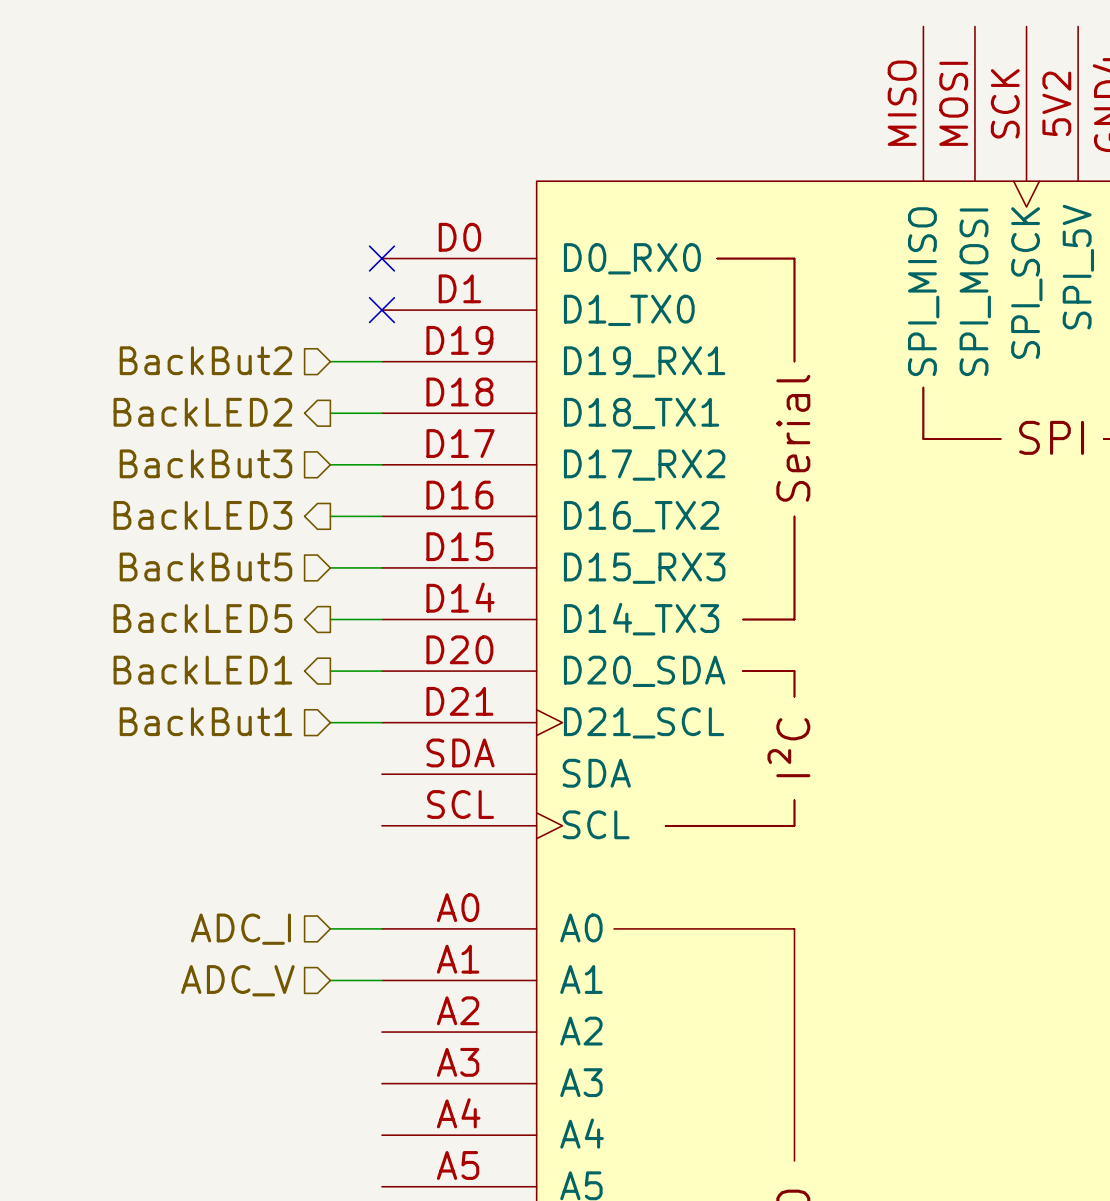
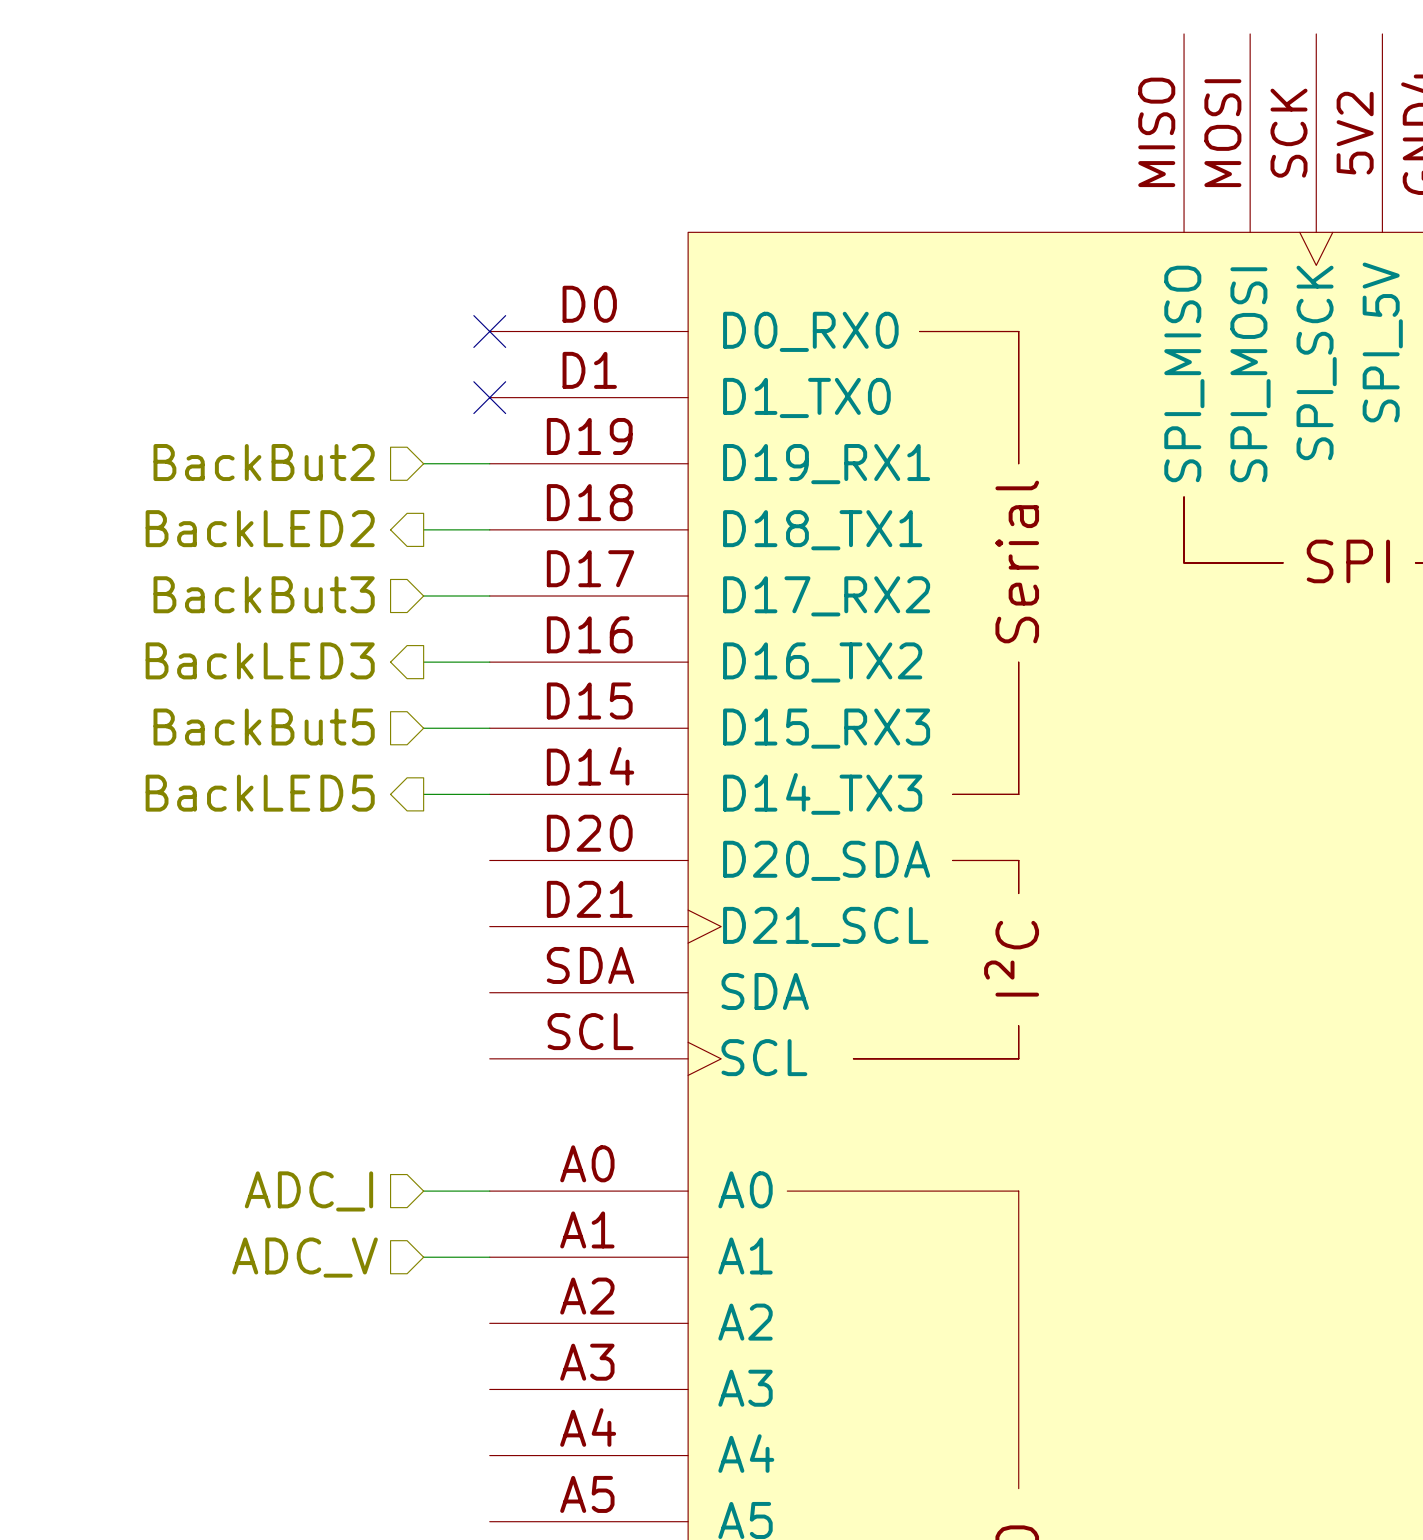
hierarchical label: BackLED1 (202, 670) -> none
wire: (330, 671) (381, 671) -> none
hierarchical label: BackBut1 (205, 721) -> none
wire: (330, 722) (381, 722) -> none

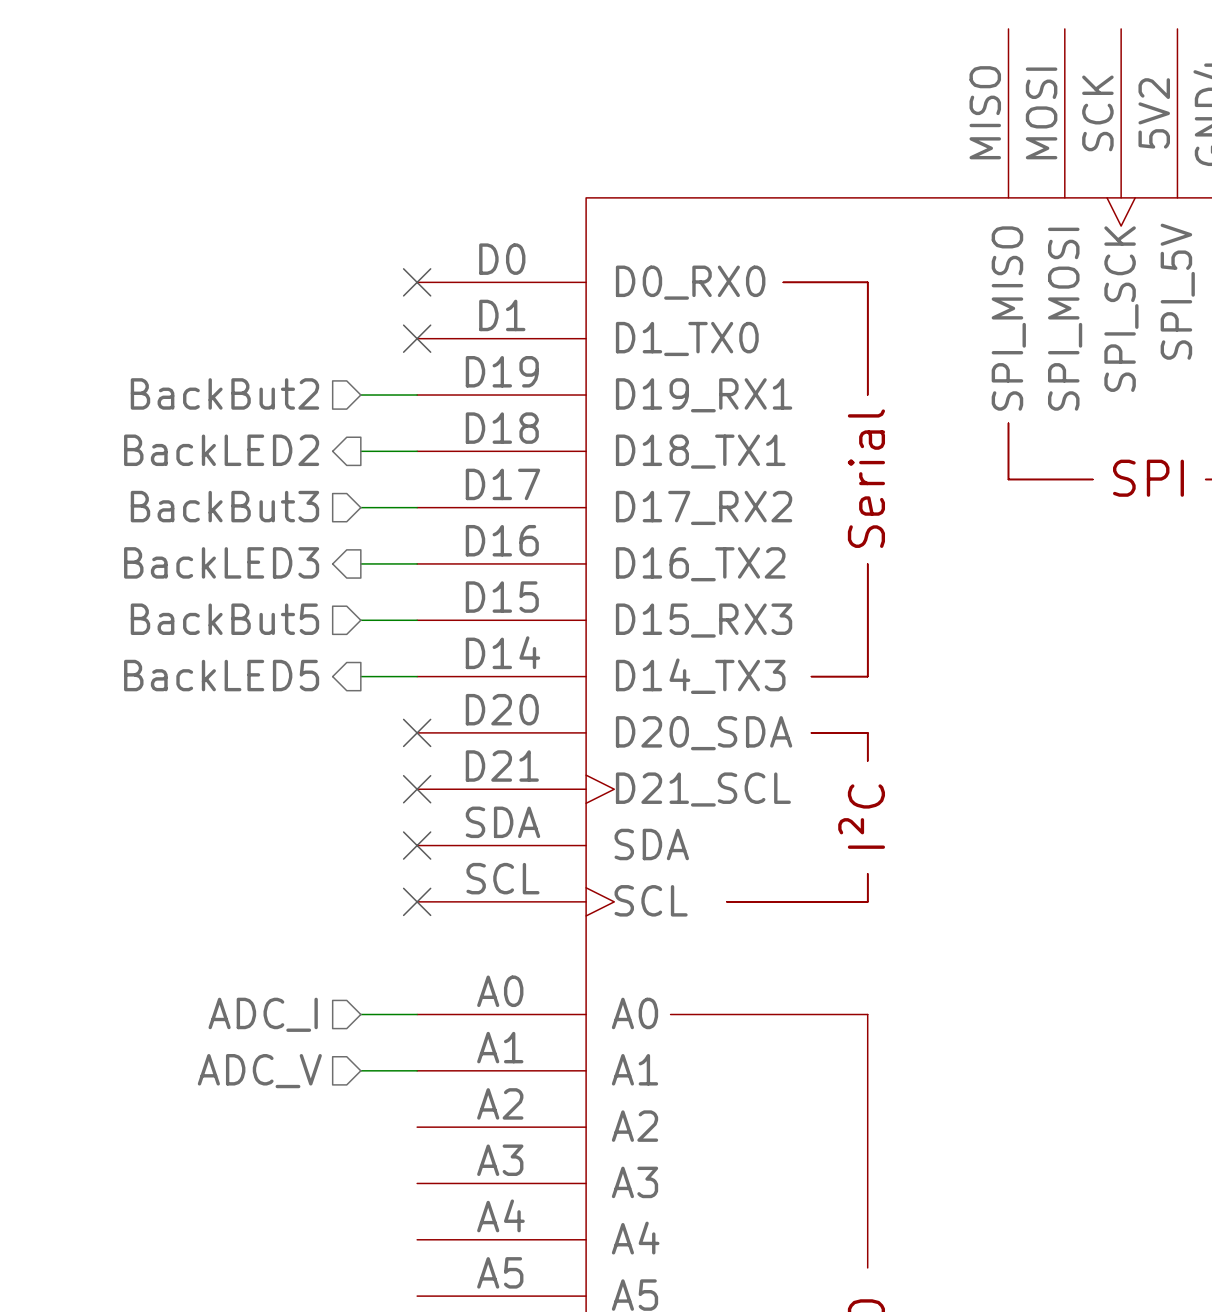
no-connect mark: none -> (417, 732)
no-connect mark: none -> (417, 789)
no-connect mark: none -> (417, 845)
no-connect mark: none -> (417, 901)

